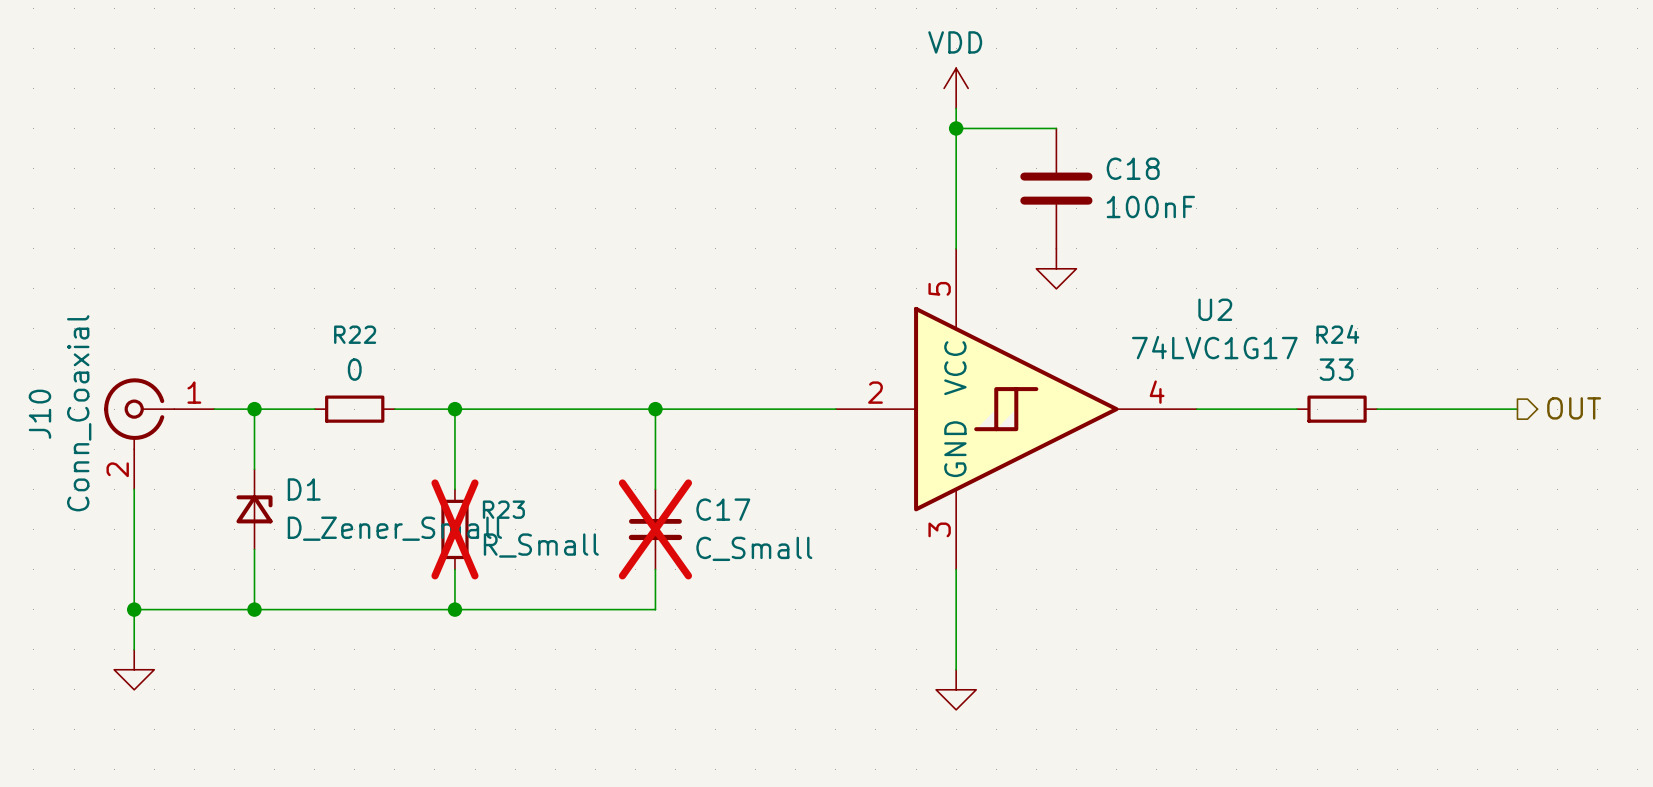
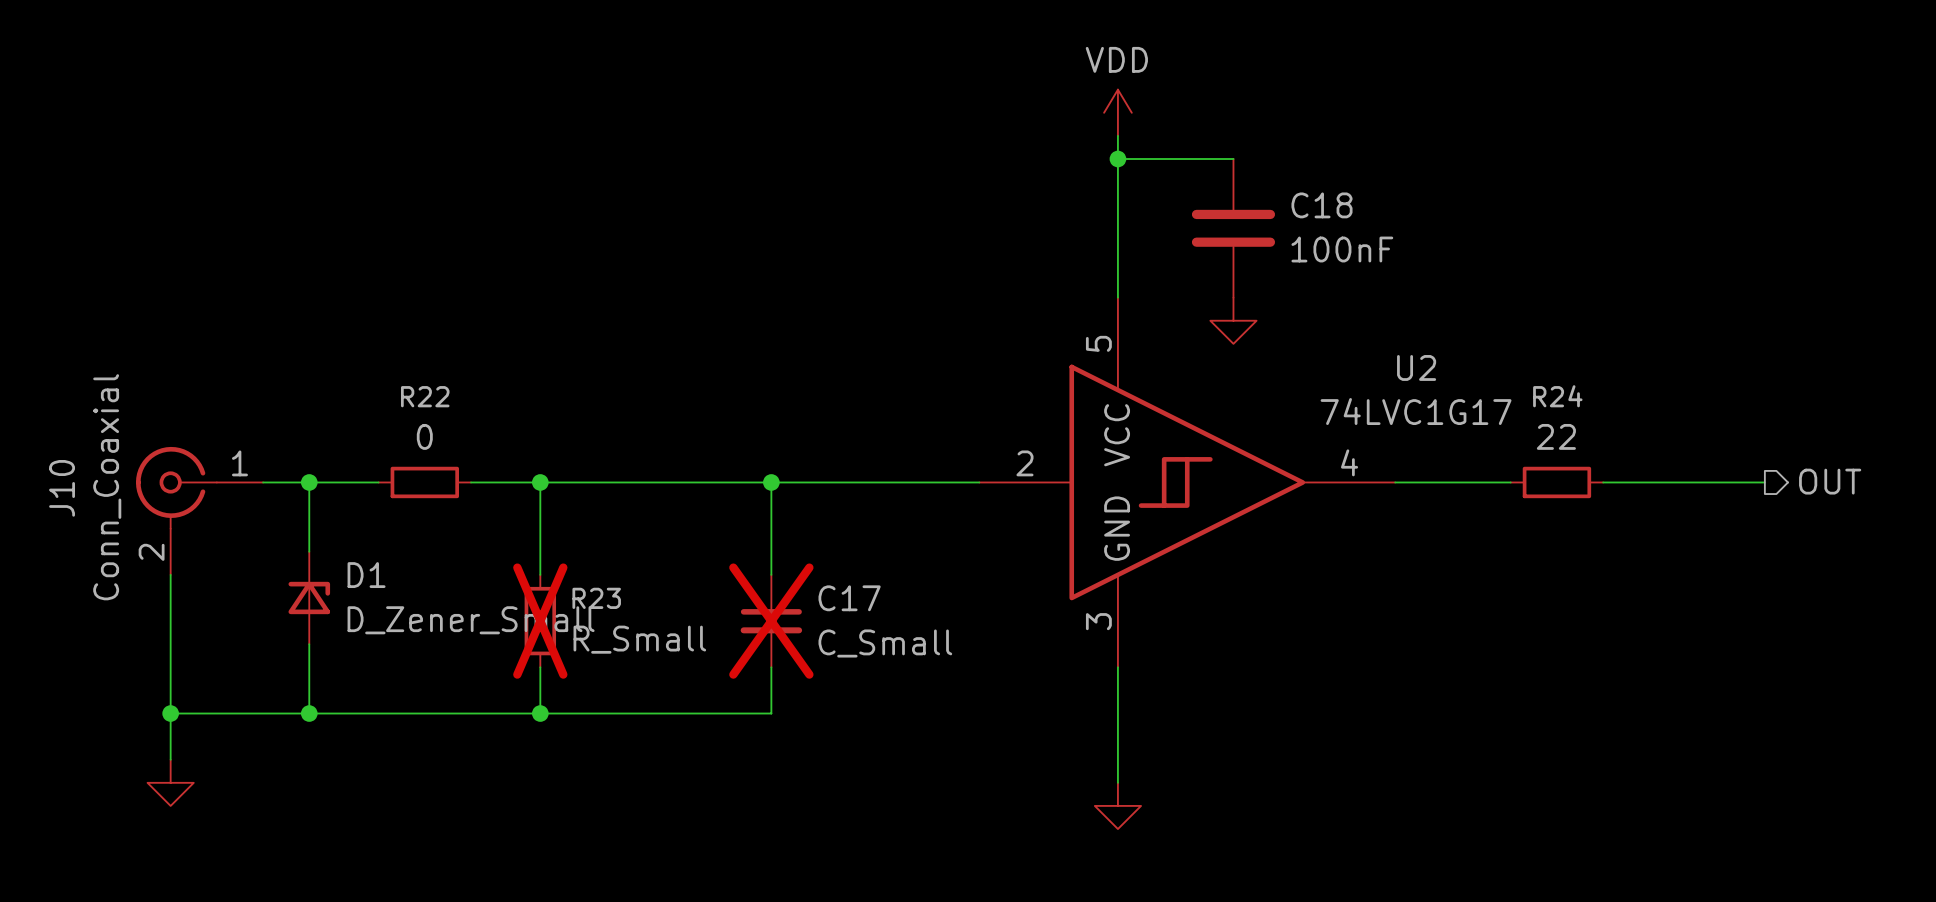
R24 value: 33 (1336, 369) -> 22 (1556, 436)

